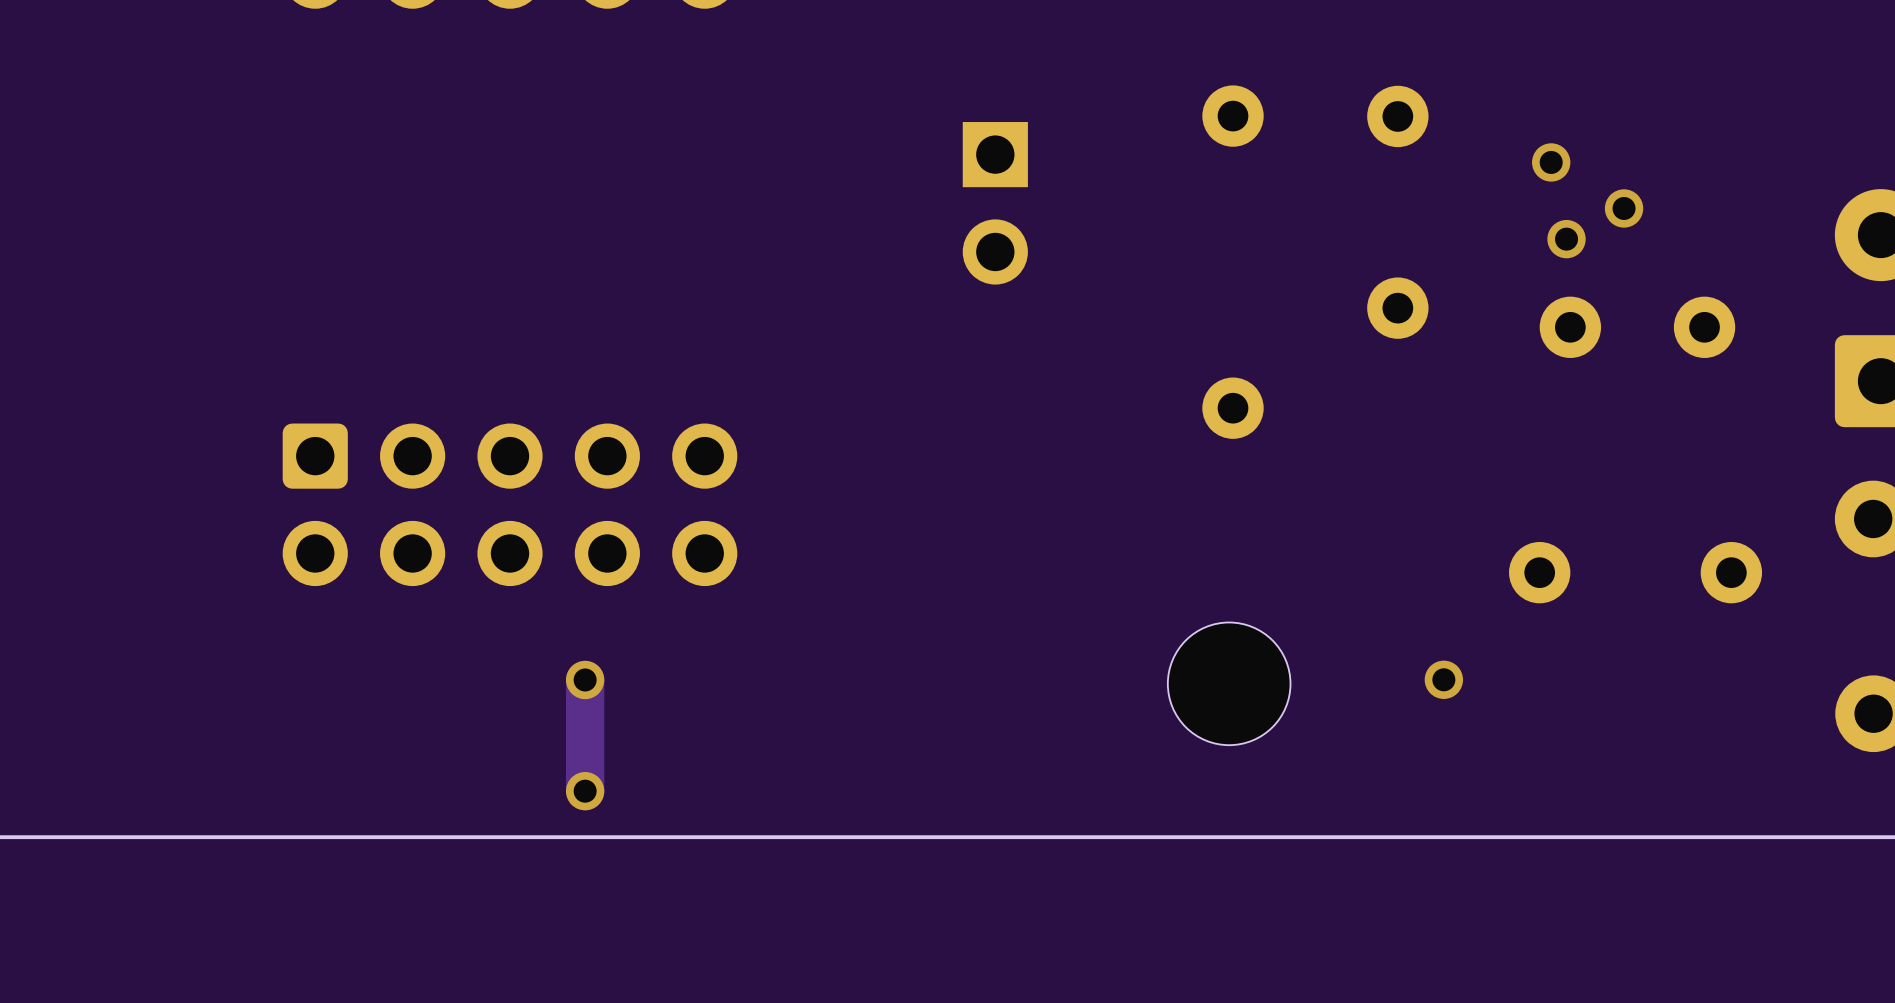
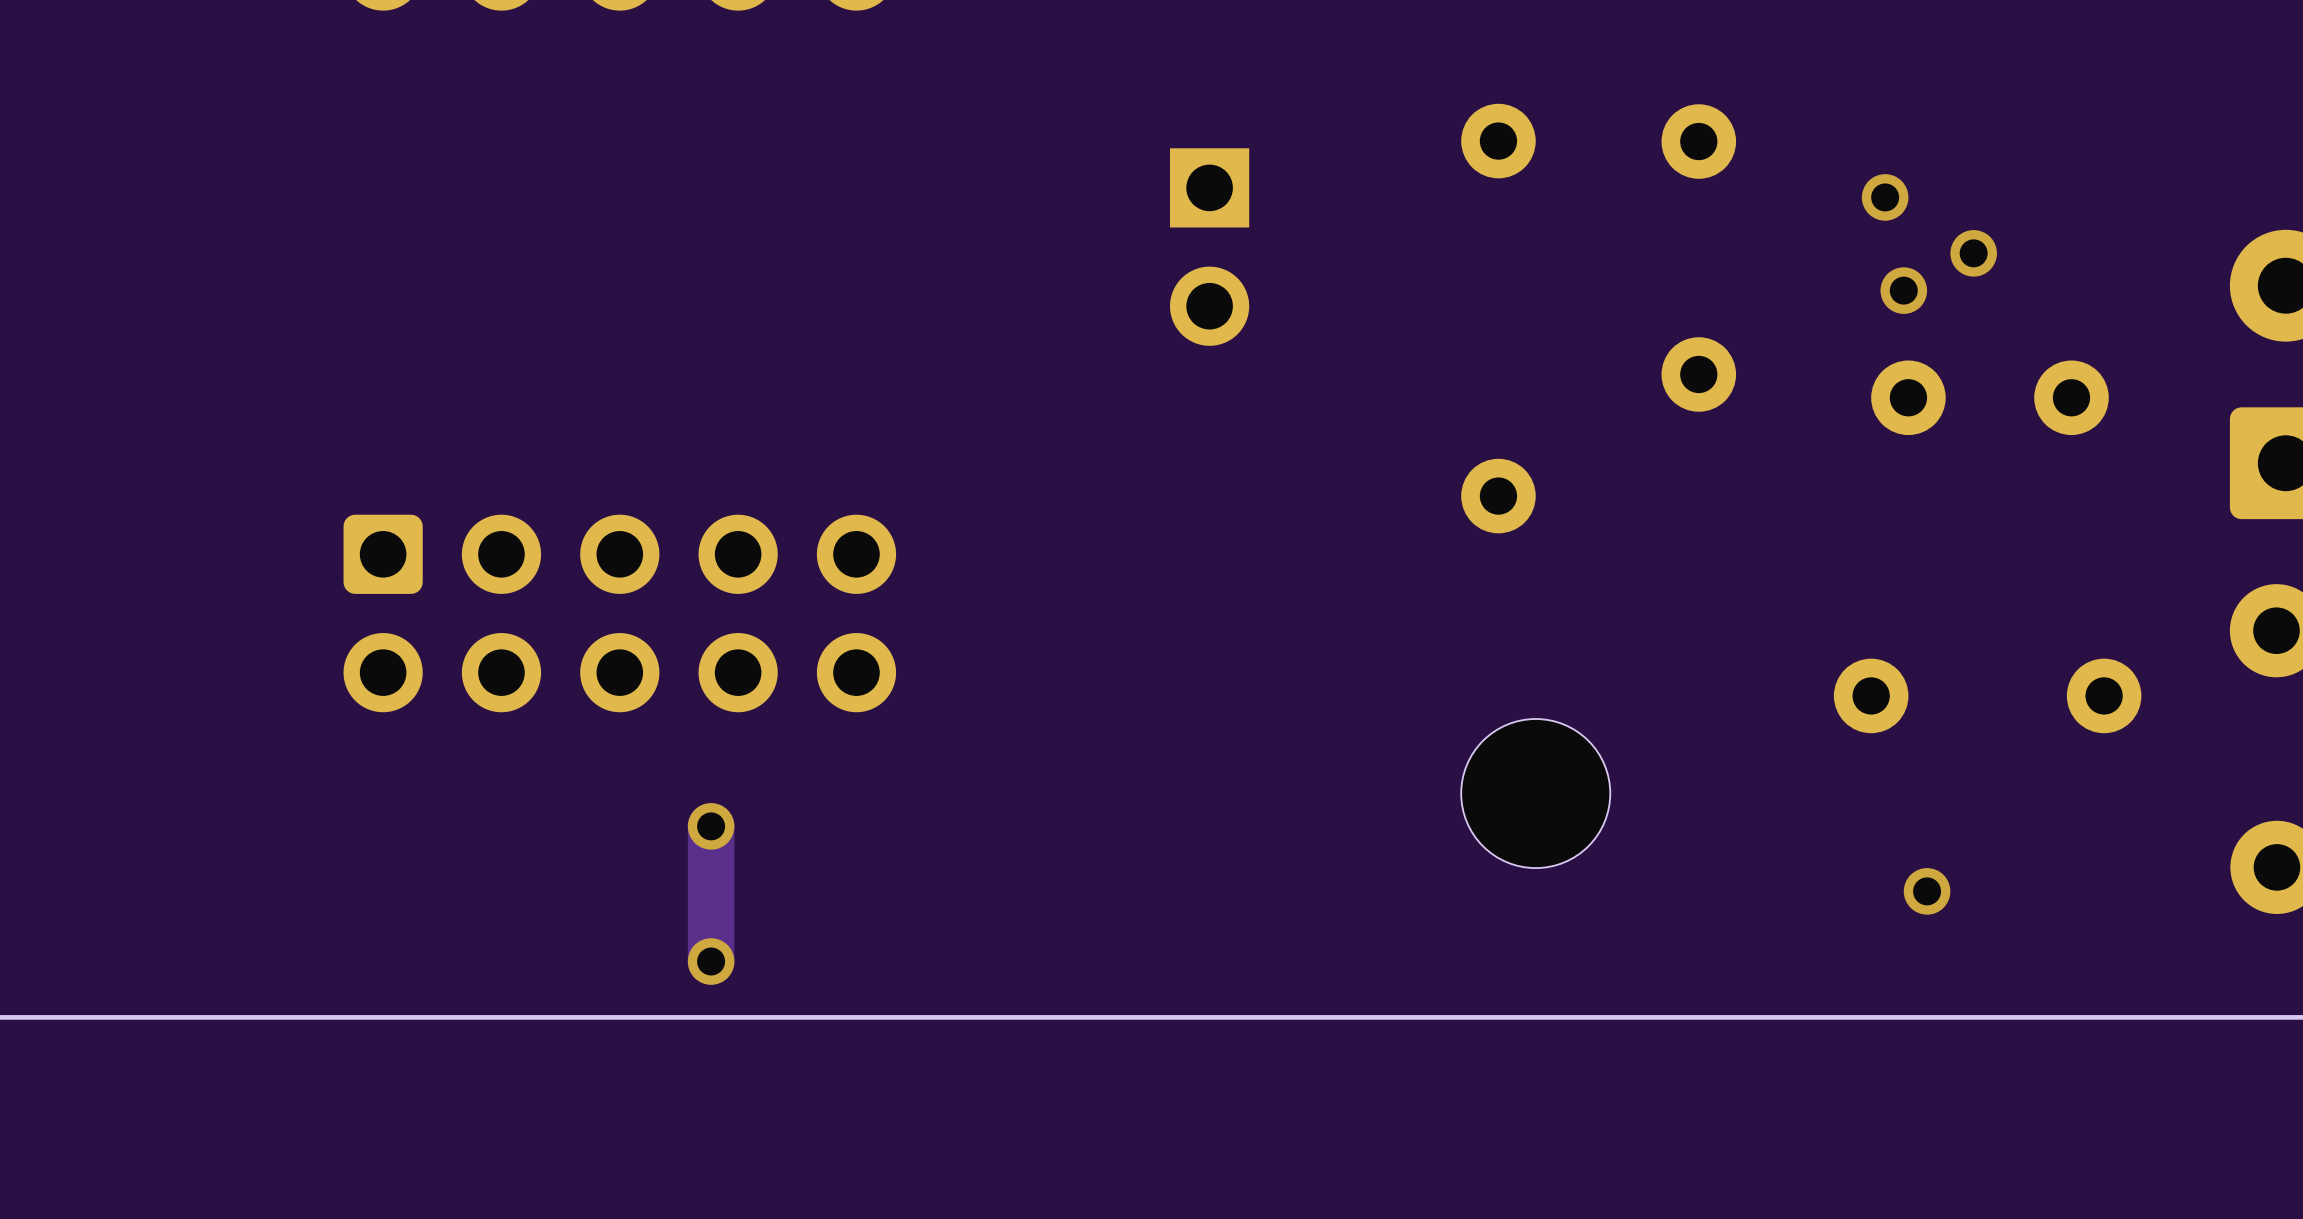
via position: (1443, 679) -> (1927, 891)
part position: (1229, 683) -> (1535, 793)

